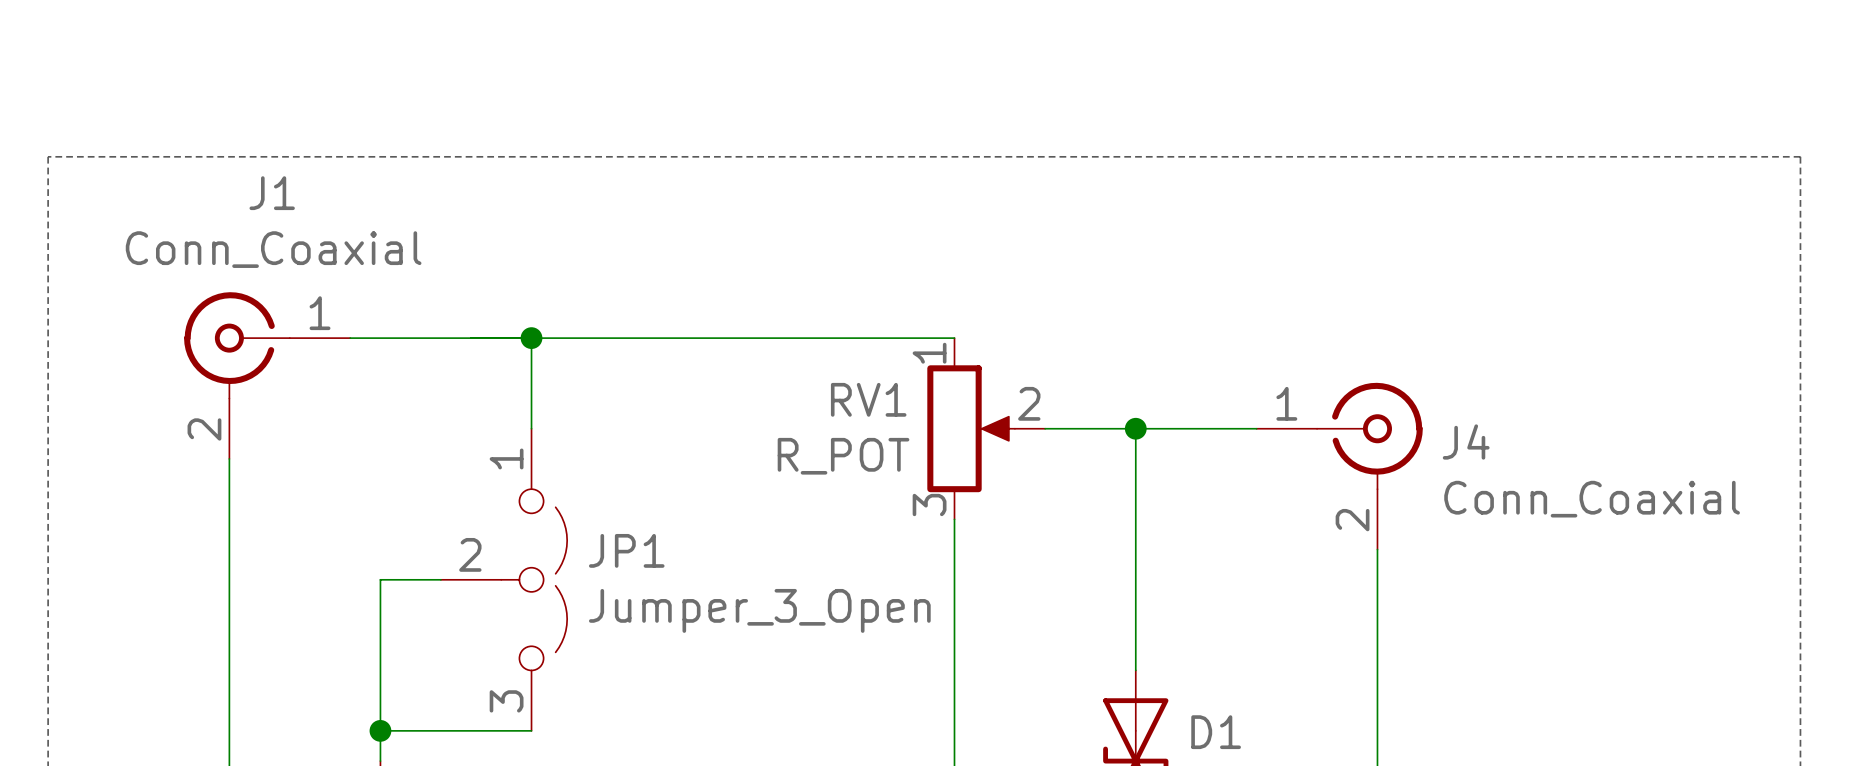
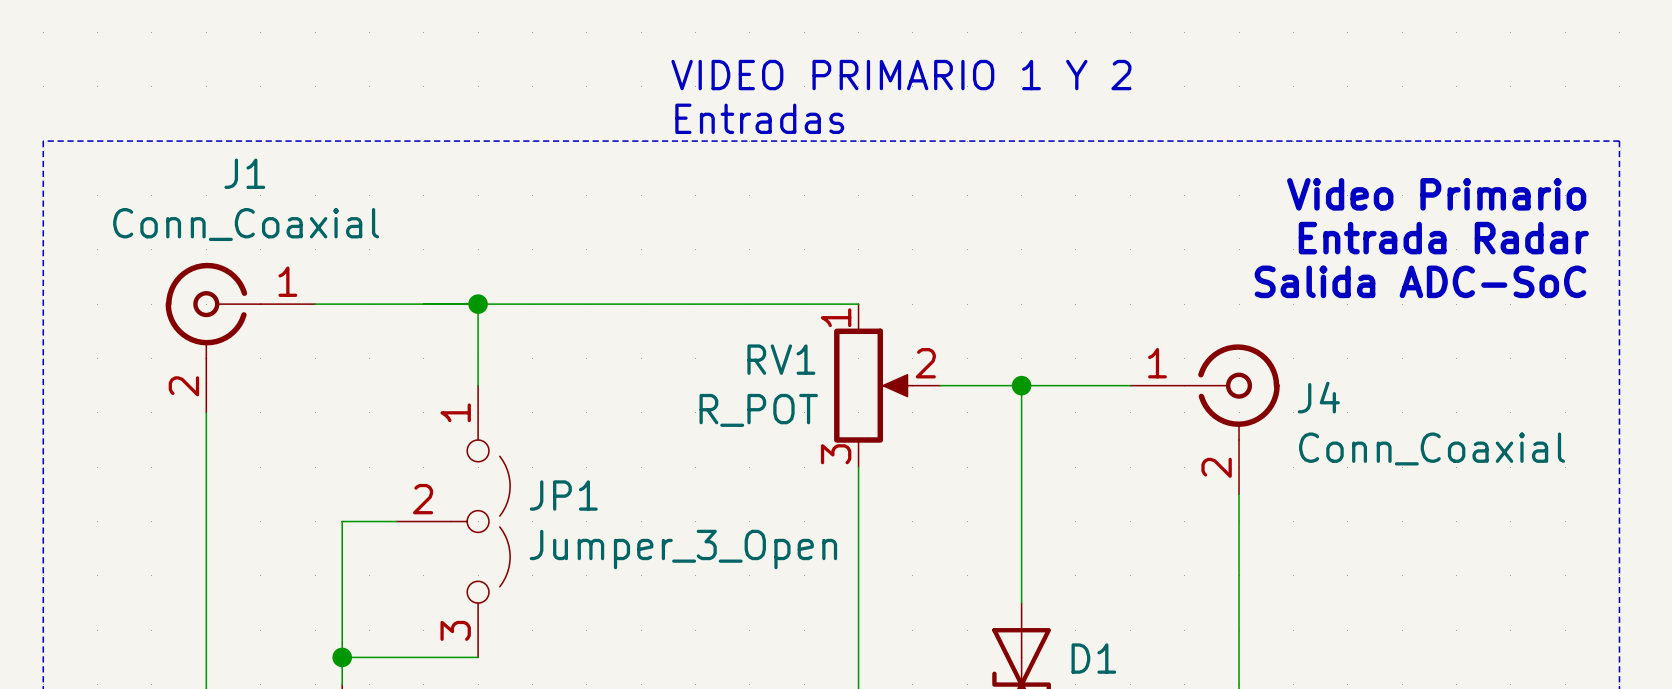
text: none -> VIDEO PRIMARIO 1 Y 2 (901, 75)
text: none -> Entradas (759, 118)
text: none -> Video Primario (1436, 194)
text: none -> Entrada Radar (1443, 238)
text: none -> Salida ADC-SoC (1420, 281)

